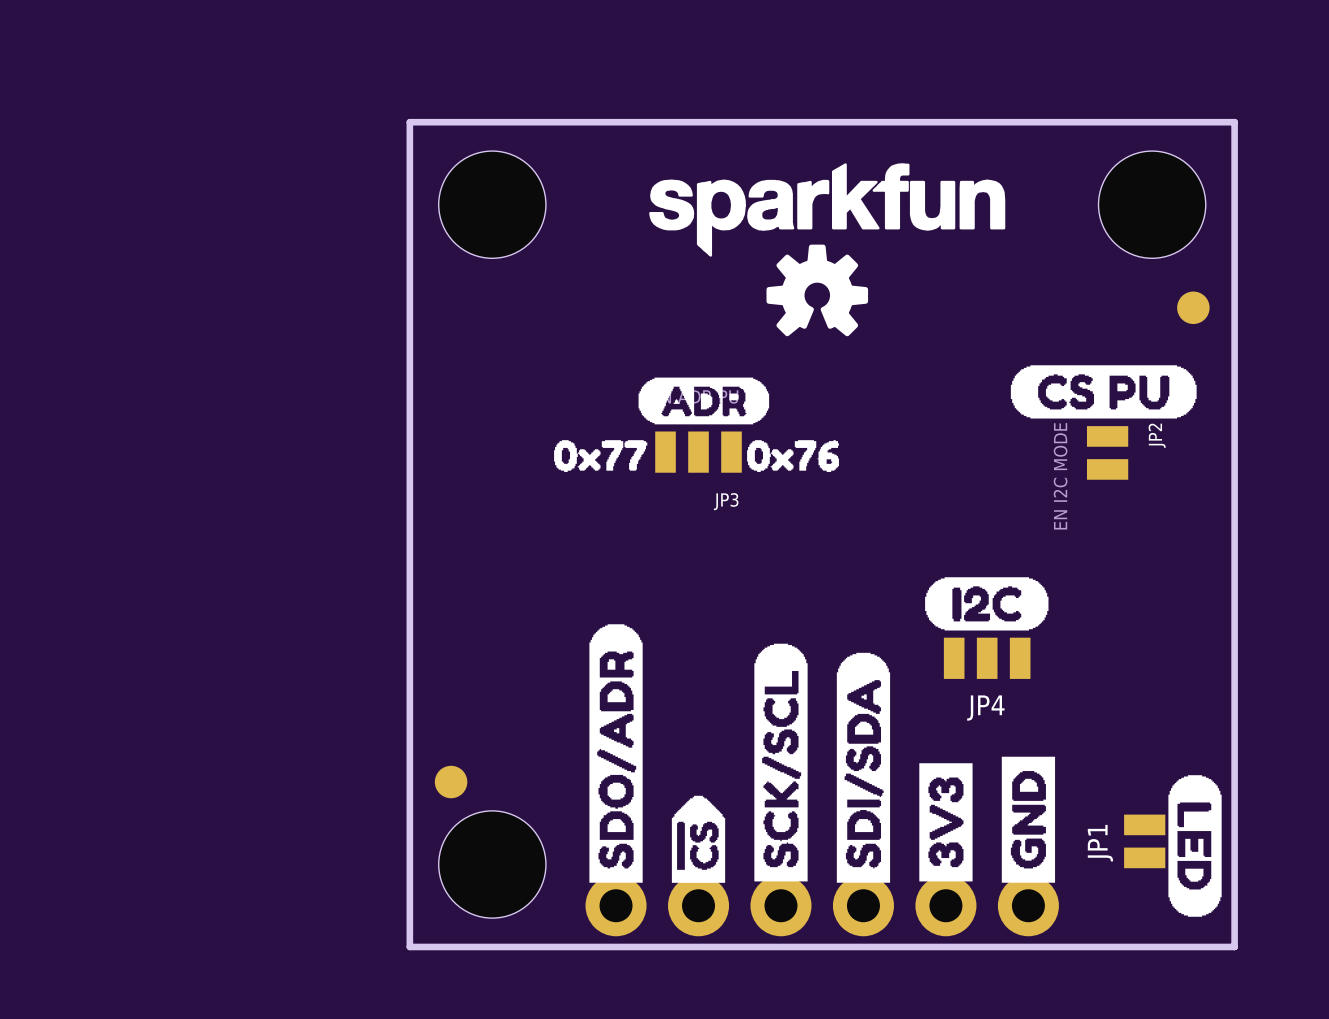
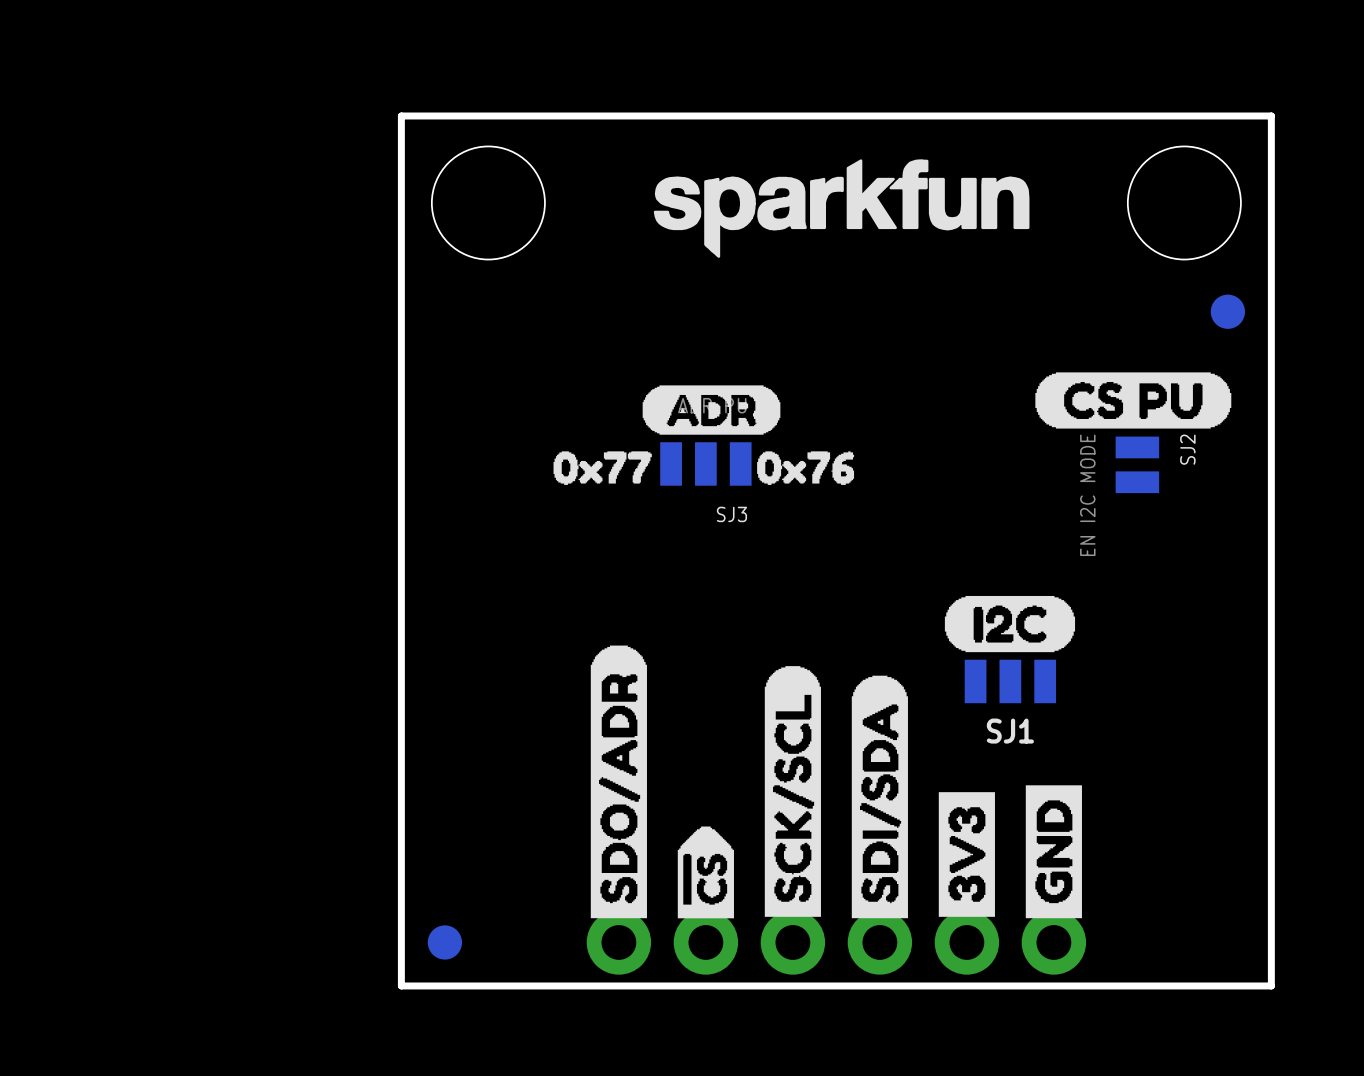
drawing: [766, 244, 869, 337] -> none
JP2 name: JP2 (1157, 435) -> SJ2 (1187, 449)
JP3 name: JP3 (726, 501) -> SJ3 (731, 514)
JP4 name: JP4 (985, 708) -> SJ1 (1010, 731)
drawing: [1168, 775, 1222, 917] -> none
part position: (451, 782) -> (444, 942)
JP1: (1144, 841) -> none
part: (492, 864) -> none

